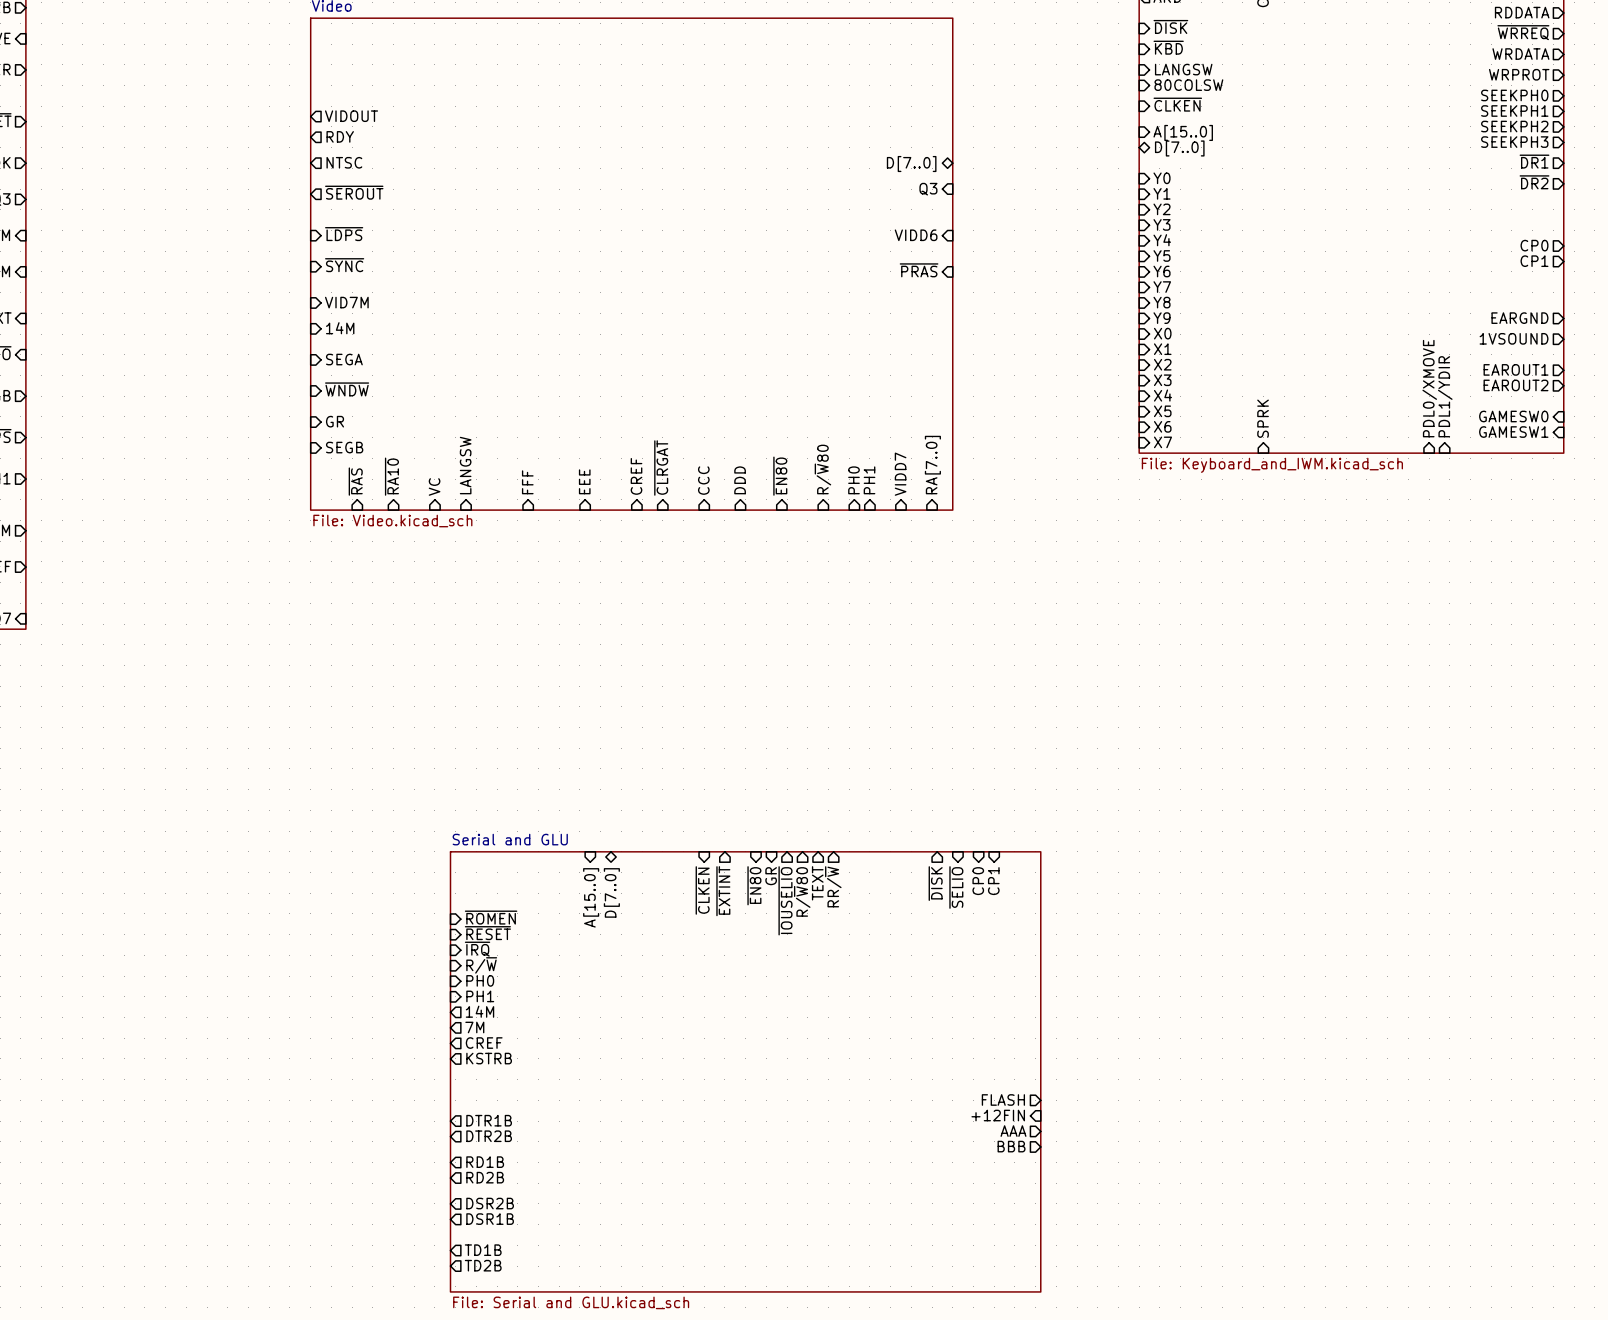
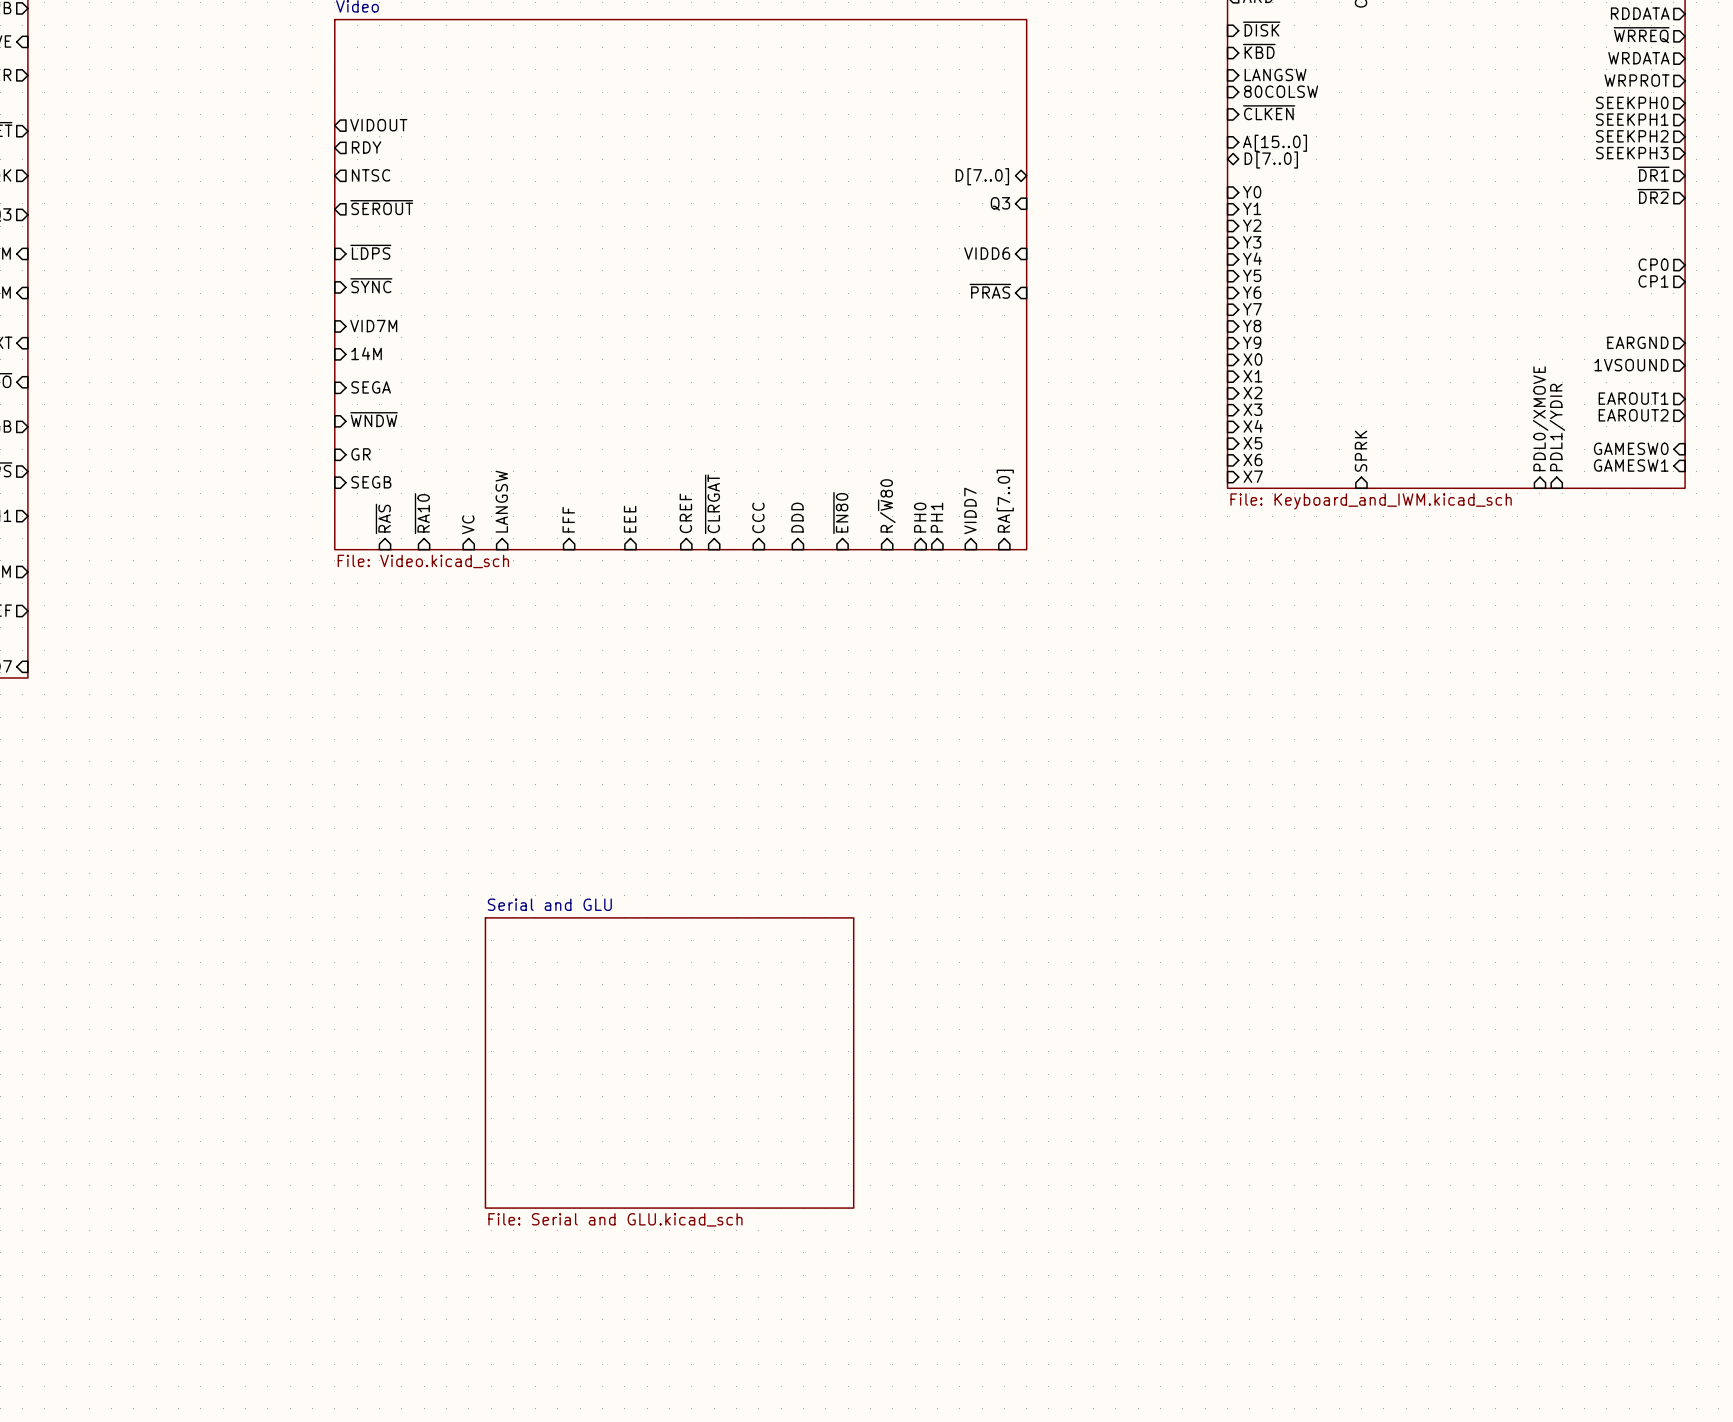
sheet pin: GR (771, 876) -> none
sheet pin: CP0 (978, 881) -> none
sheet pin: CP1 (993, 881) -> none
sheet pin: TEXT (817, 883) -> none
sheet pin: ~{DISK} (935, 883) -> none
sheet pin: ~{EN80} (754, 885) -> none
sheet pin: RR/~{W} (833, 886) -> none
sheet pin: ~{SELIO} (956, 887) -> none
sheet pin: ~{CLKEN} (702, 890) -> none
sheet pin: ~{EXTINT} (723, 891) -> none
sheet pin: R/~{W}80 (802, 891) -> none
sheet pin: D[7..0] (611, 892) -> none
sheet pin: A[15..0] (591, 897) -> none
sheet pin: ~{IOUSELIO} (785, 900) -> none
sheet pin: ~{ROMEN} (491, 917) -> none
sheet pin: ~{RESET} (487, 933) -> none
sheet pin: ~{IRQ} (477, 949) -> none
sheet pin: R/~{W} (481, 965) -> none
sheet pin: PH0 (480, 980) -> none
sheet Serial and GLU: none -> File: Serial and GLU.kicad_sch (669, 1062)
sheet pin: PH1 (480, 996) -> none
sheet pin: 14M (479, 1011) -> none
sheet pin: 7M (474, 1027) -> none
sheet pin: CREF (484, 1043) -> none
sheet pin: KSTRB (489, 1058) -> none
sheet Serial and GLU: File: Serial and GLU.kicad_sch (745, 1071) -> none
sheet pin: FLASH (1003, 1099) -> none
sheet pin: +12FIN (998, 1115) -> none
sheet pin: DTR1B (489, 1120) -> none
sheet pin: AAA (1013, 1131) -> none
sheet pin: DTR2B (489, 1136) -> none
sheet pin: BBB (1011, 1146) -> none
sheet pin: RD1B (485, 1162) -> none
sheet pin: RD2B (485, 1177) -> none
sheet pin: DSR2B (490, 1203) -> none
sheet pin: DSR1B (490, 1219) -> none
sheet pin: TD1B (483, 1250) -> none
sheet pin: TD2B (483, 1265) -> none

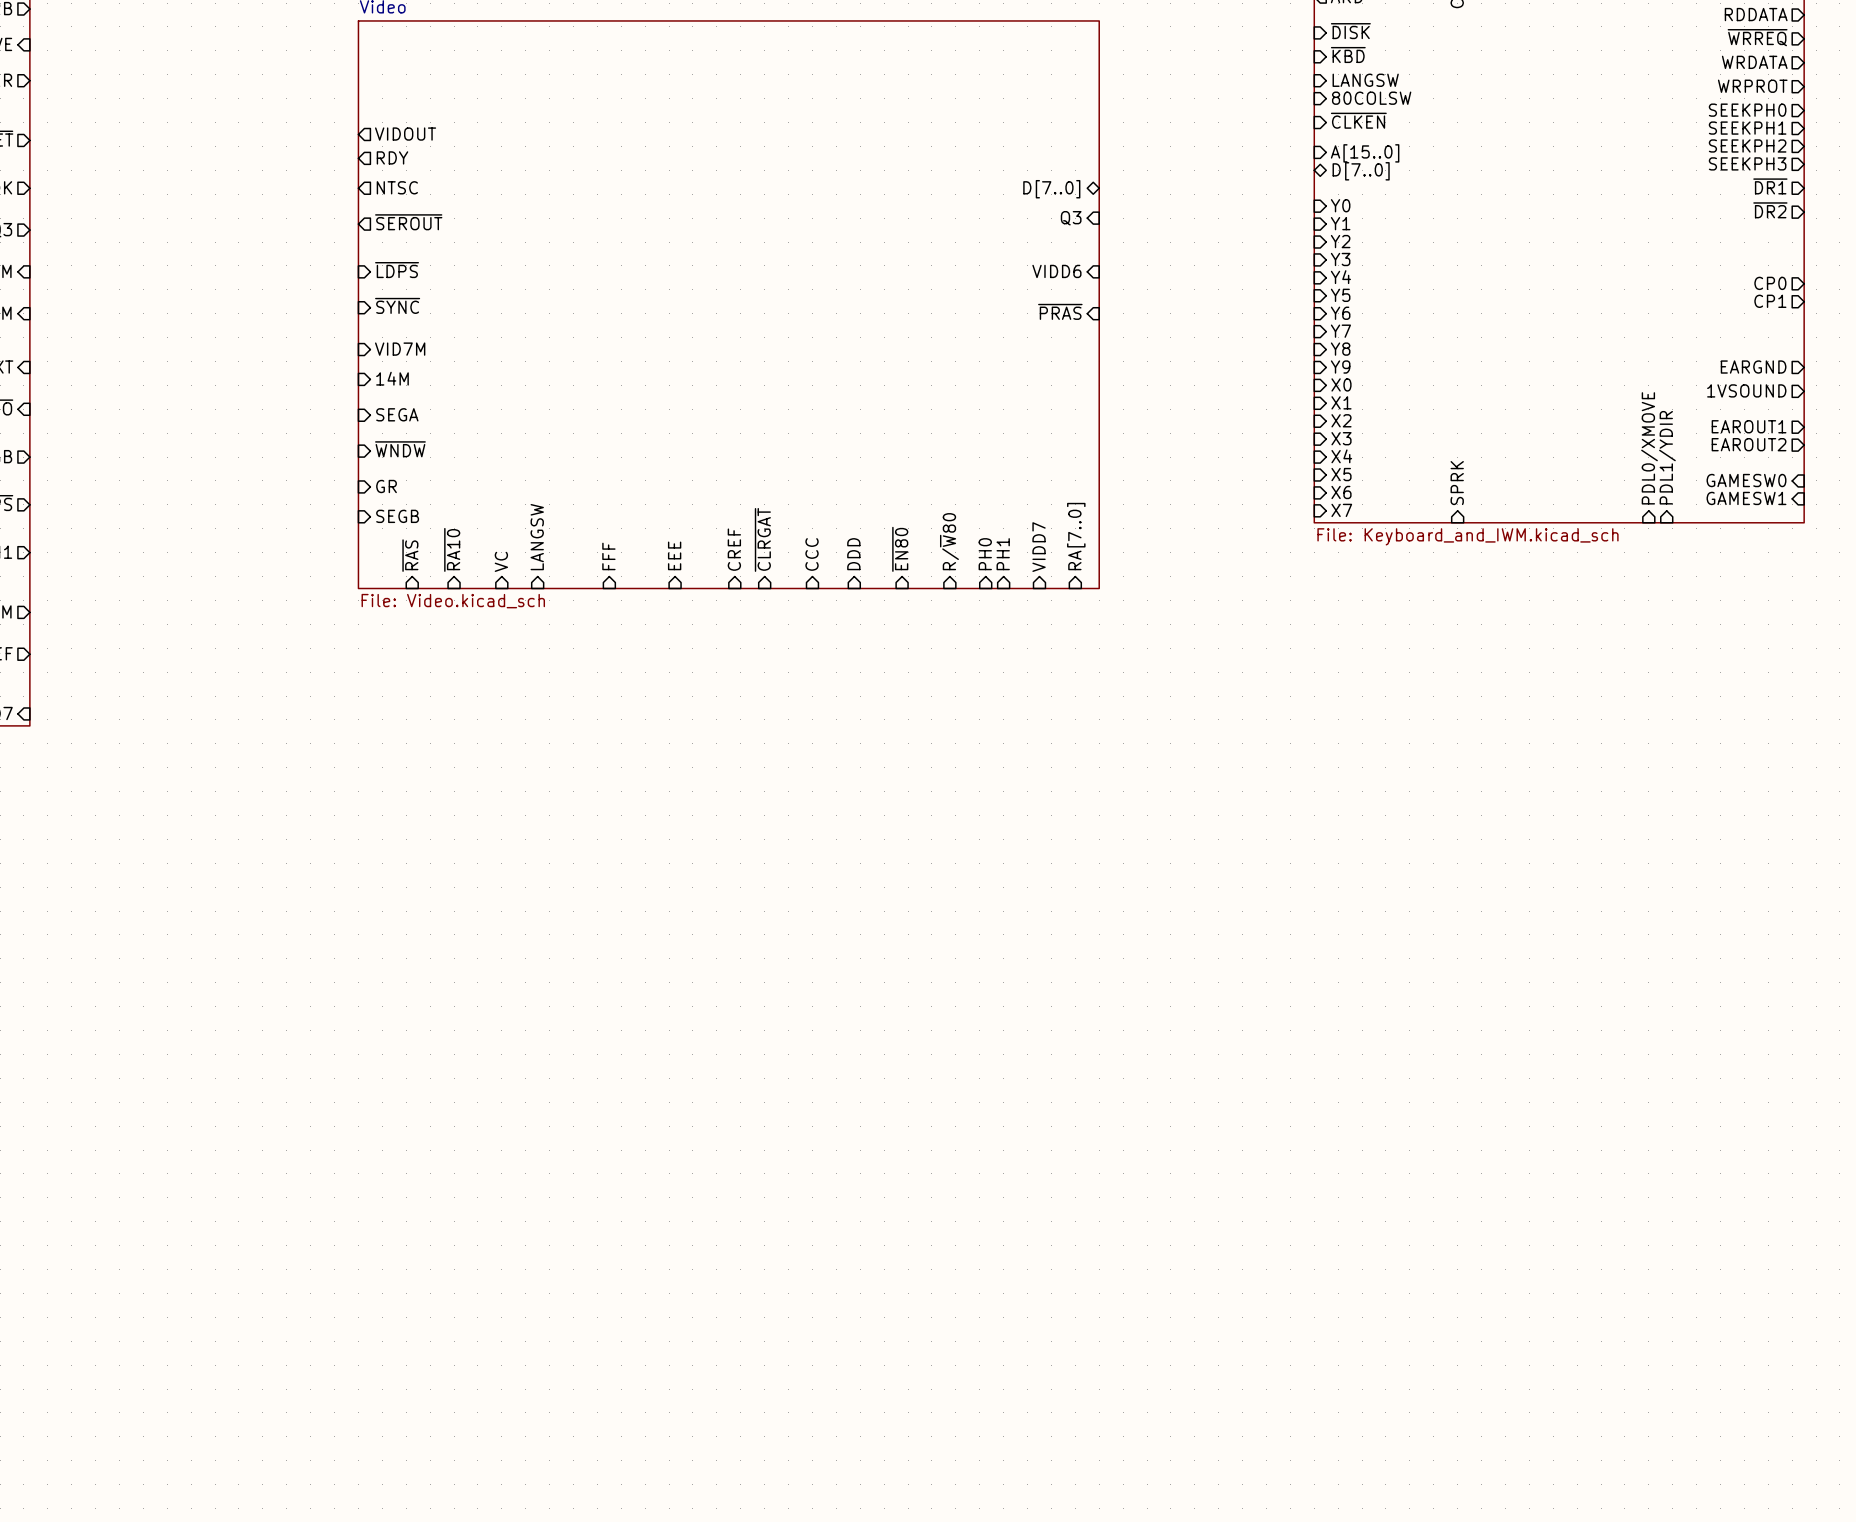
sheet Serial and GLU: File: Serial and GLU.kicad_sch (669, 1062) -> none

